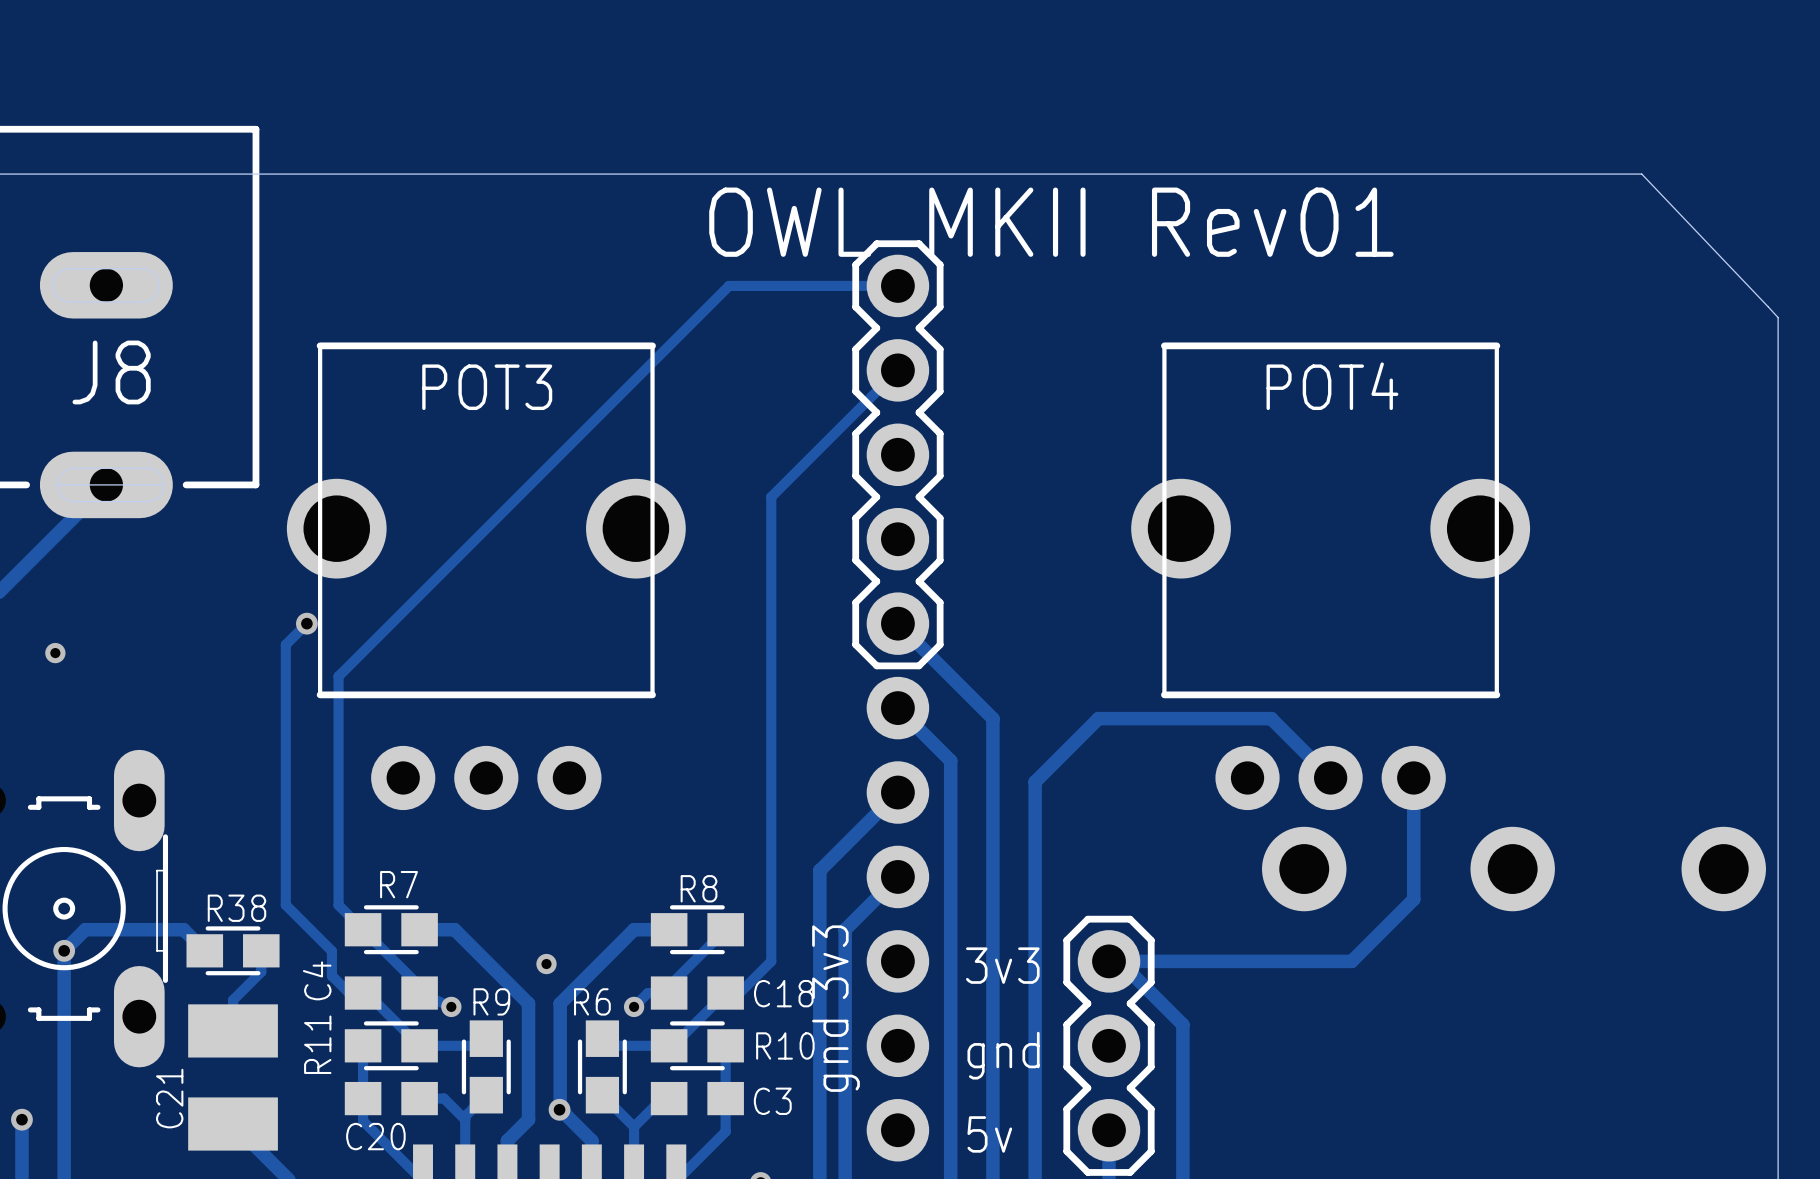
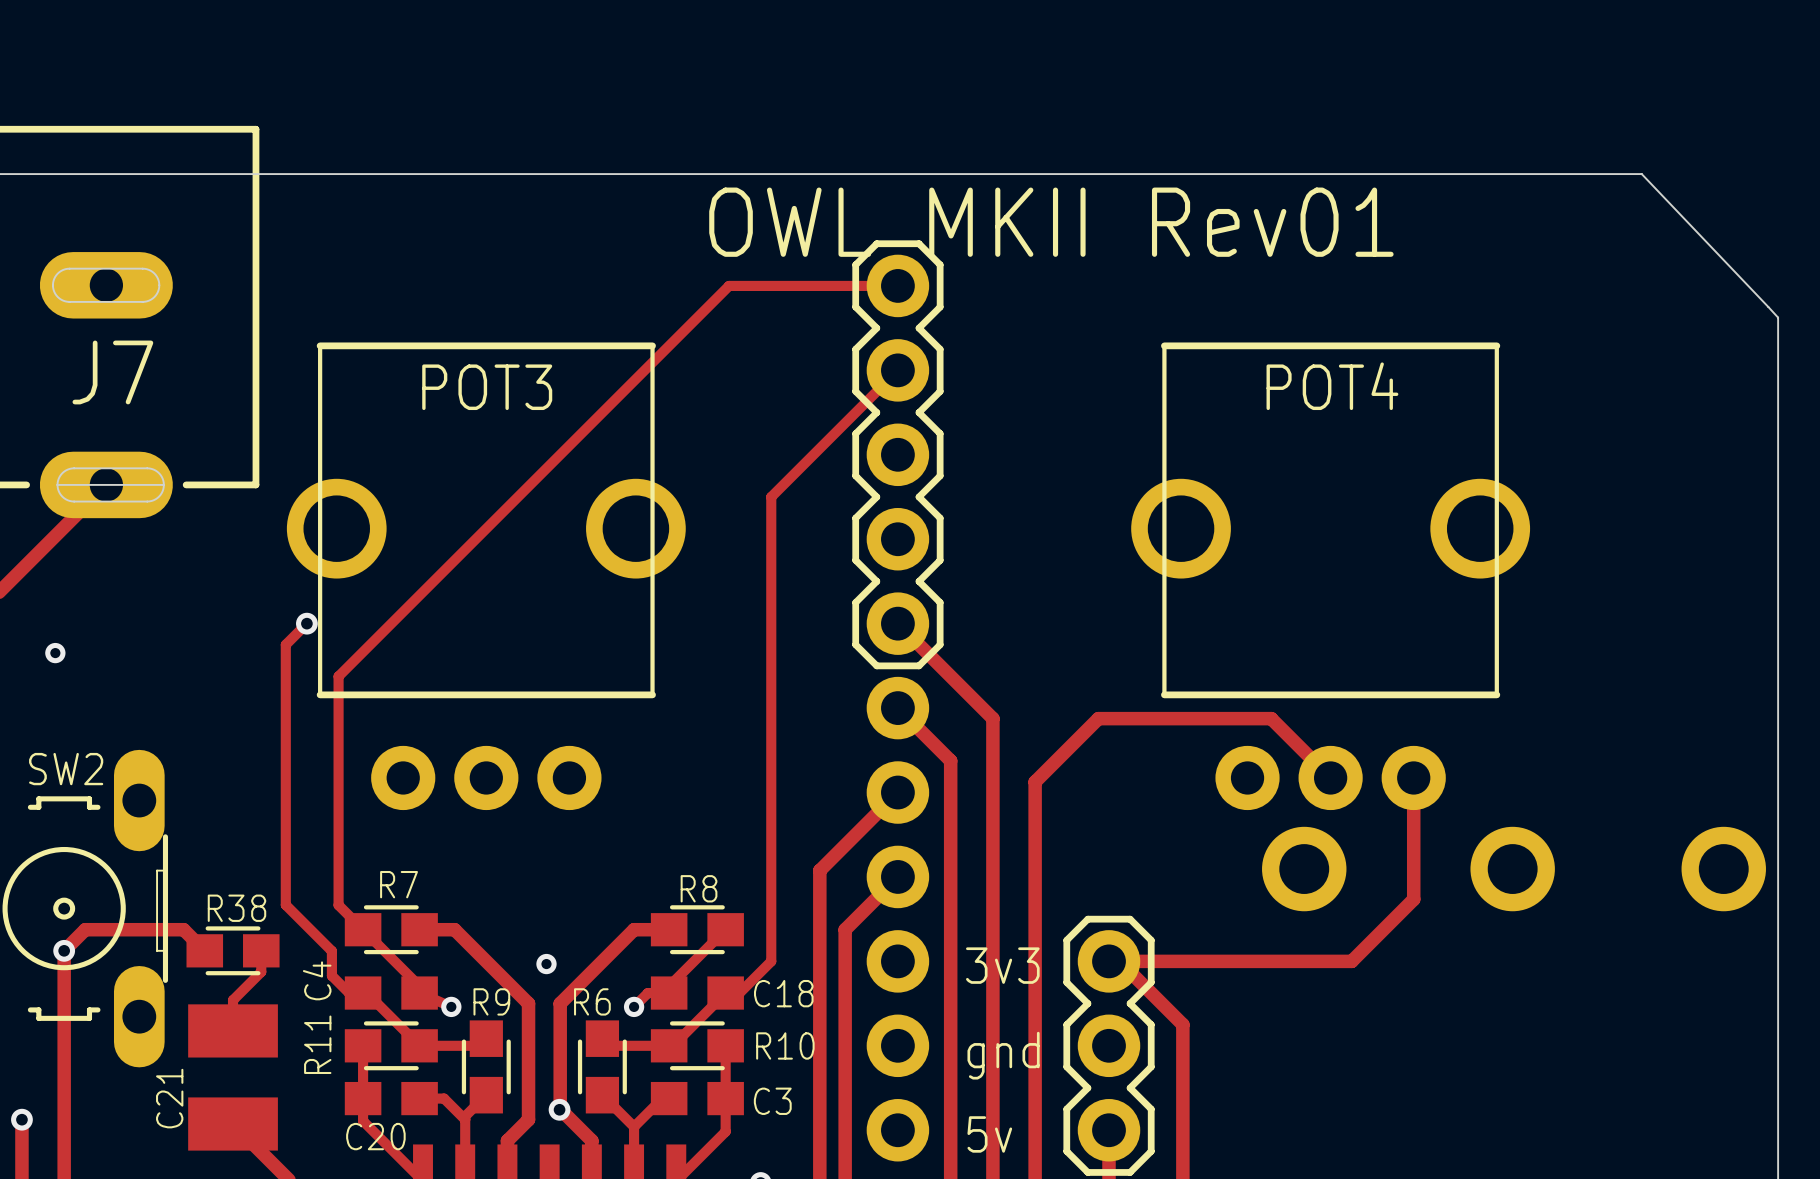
J8 name: J8 (111, 372) -> J7 (112, 372)
SW2 name: none -> SW2 (66, 769)
text: 3v3 (830, 962) -> none
text: gnd (836, 1055) -> none

